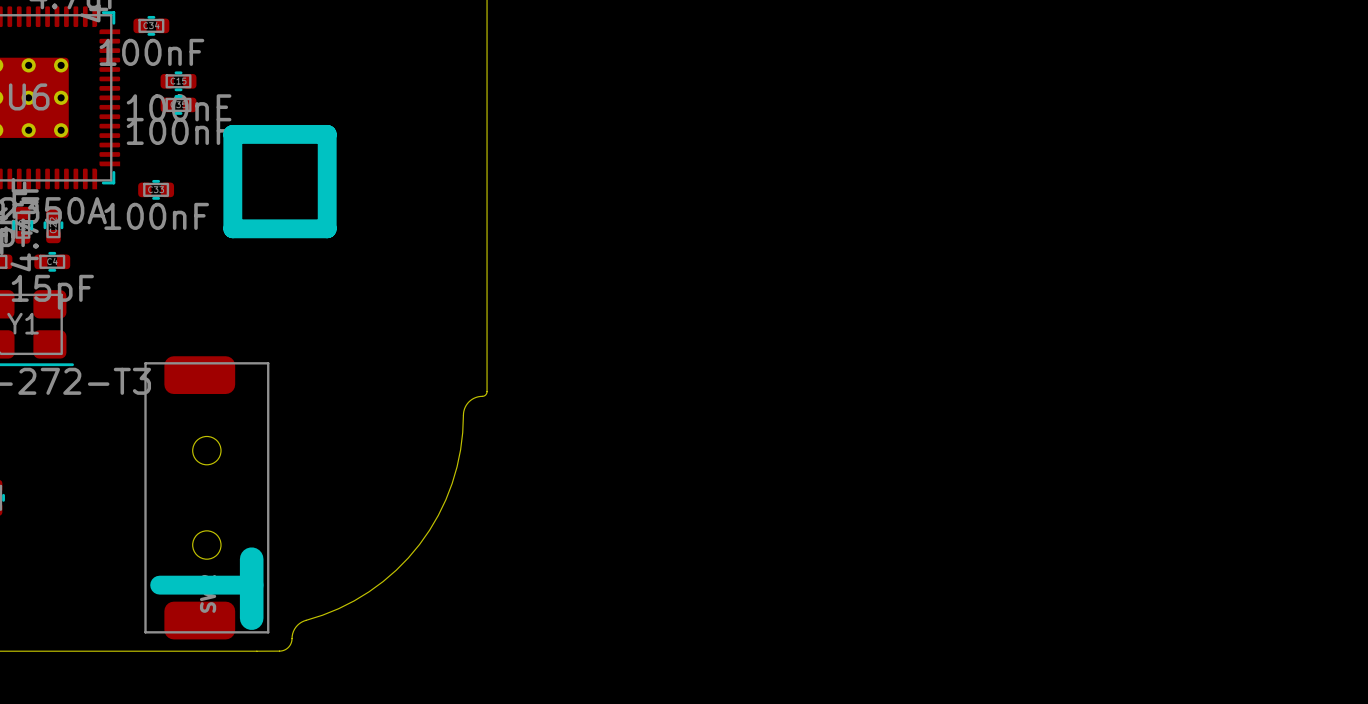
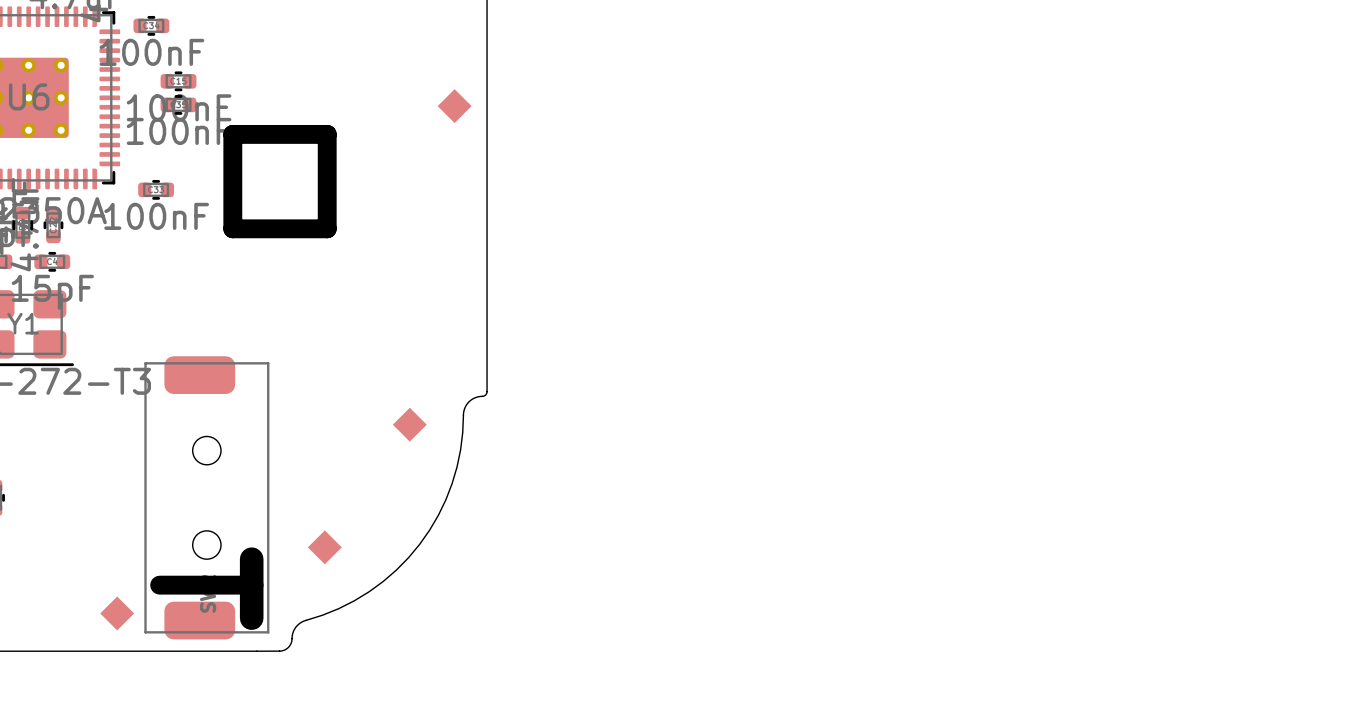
part: none -> (454, 106)
part: none -> (409, 424)
part: none -> (324, 547)
part: none -> (117, 613)

